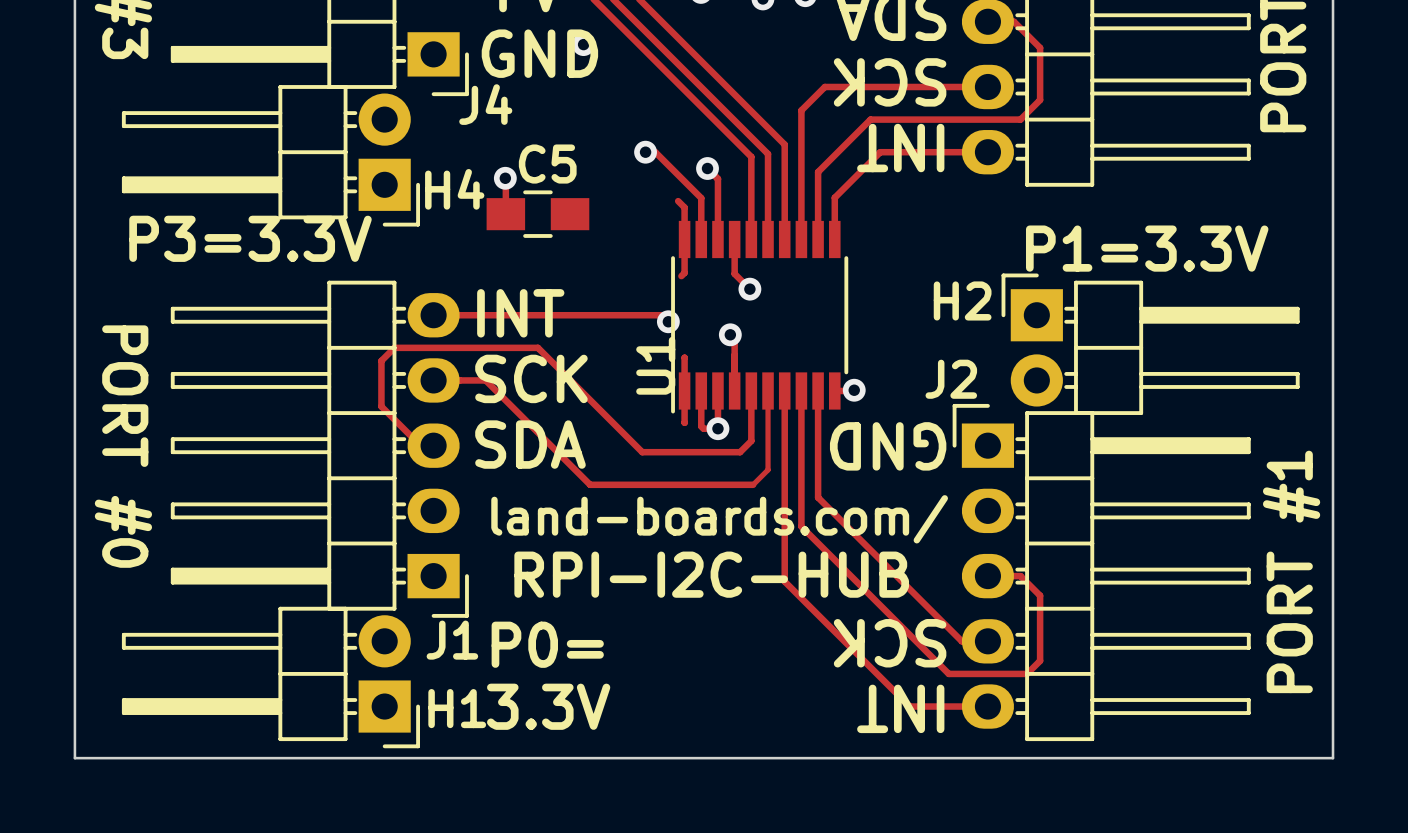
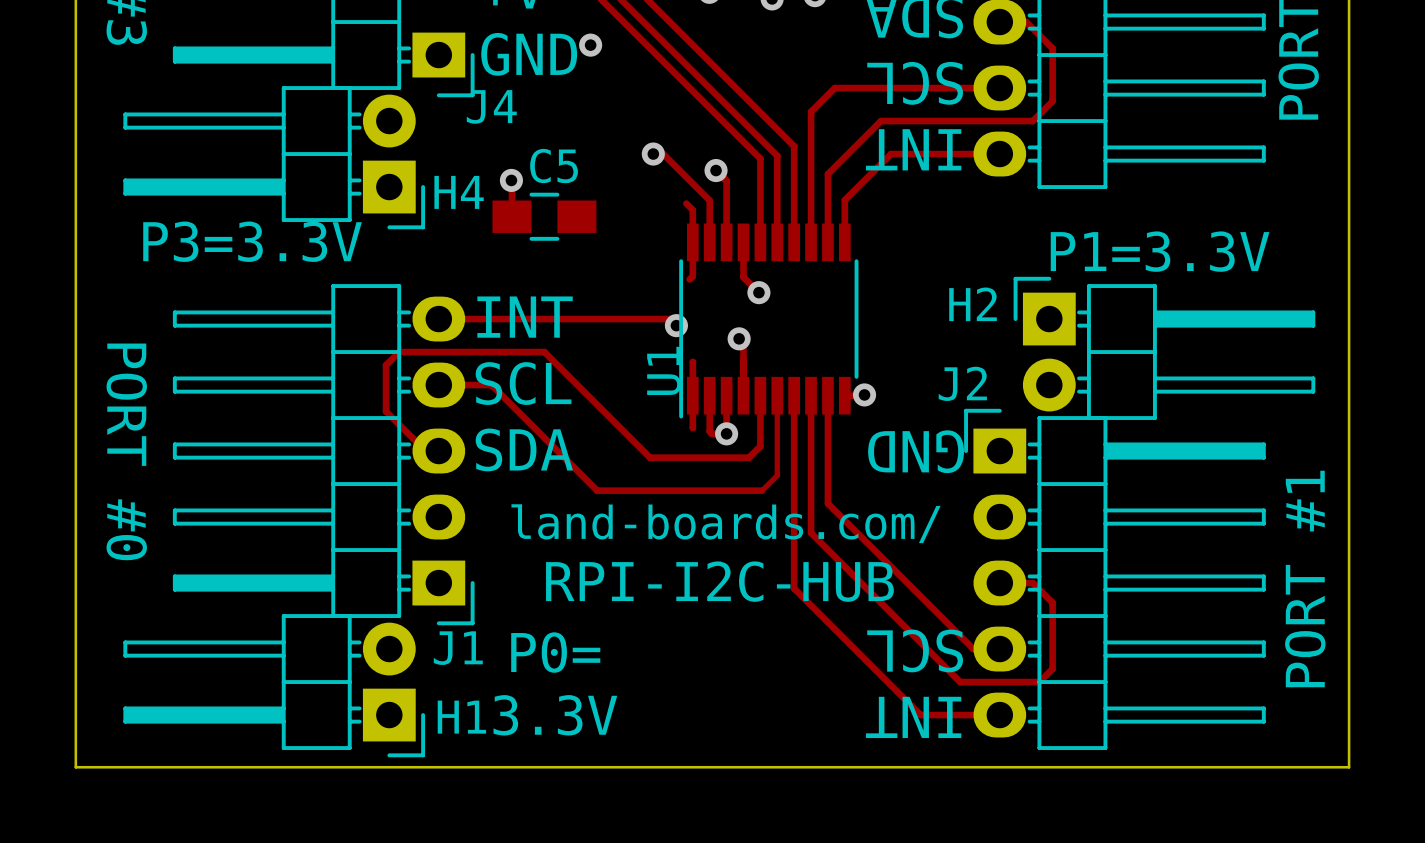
text: SCK (890, 82) -> SCL (915, 83)
text: SCK (531, 378) -> SCL (523, 383)
text: SCK (890, 643) -> SCL (915, 650)

